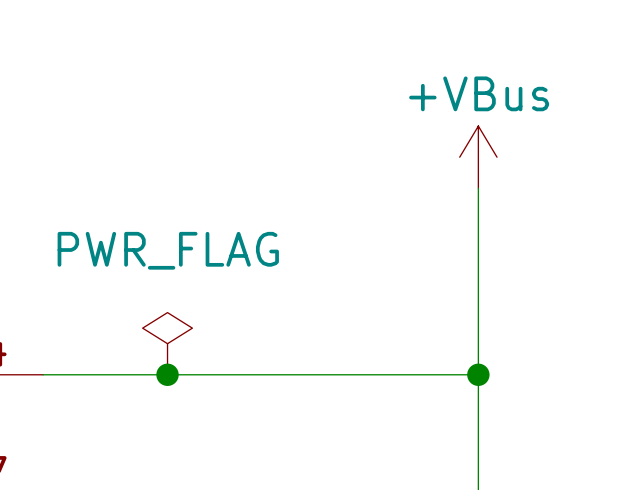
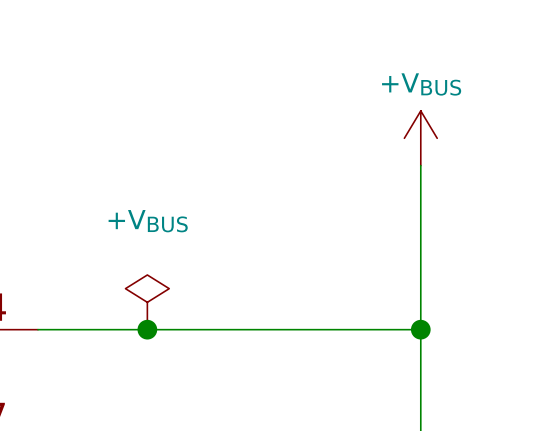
power symbol: +VBus (478, 157) -> +VBUS (420, 138)
power symbol: PWR_FLAG (167, 343) -> +VBUS (147, 302)

